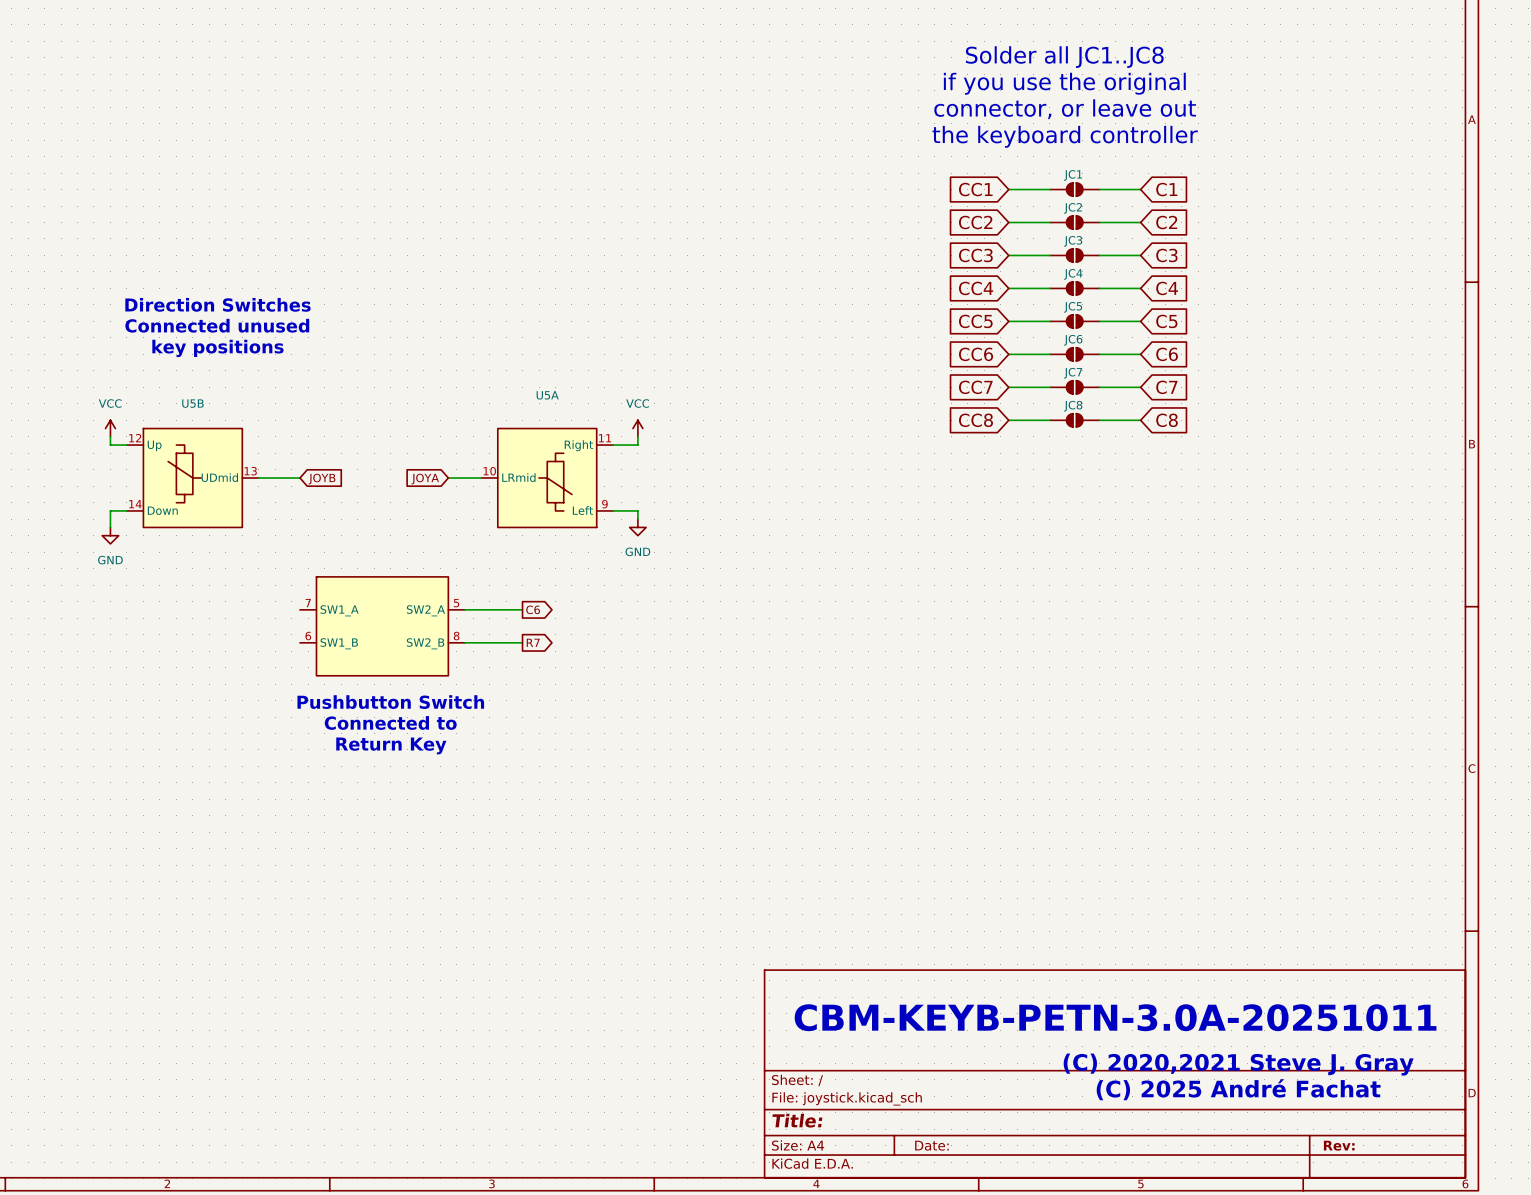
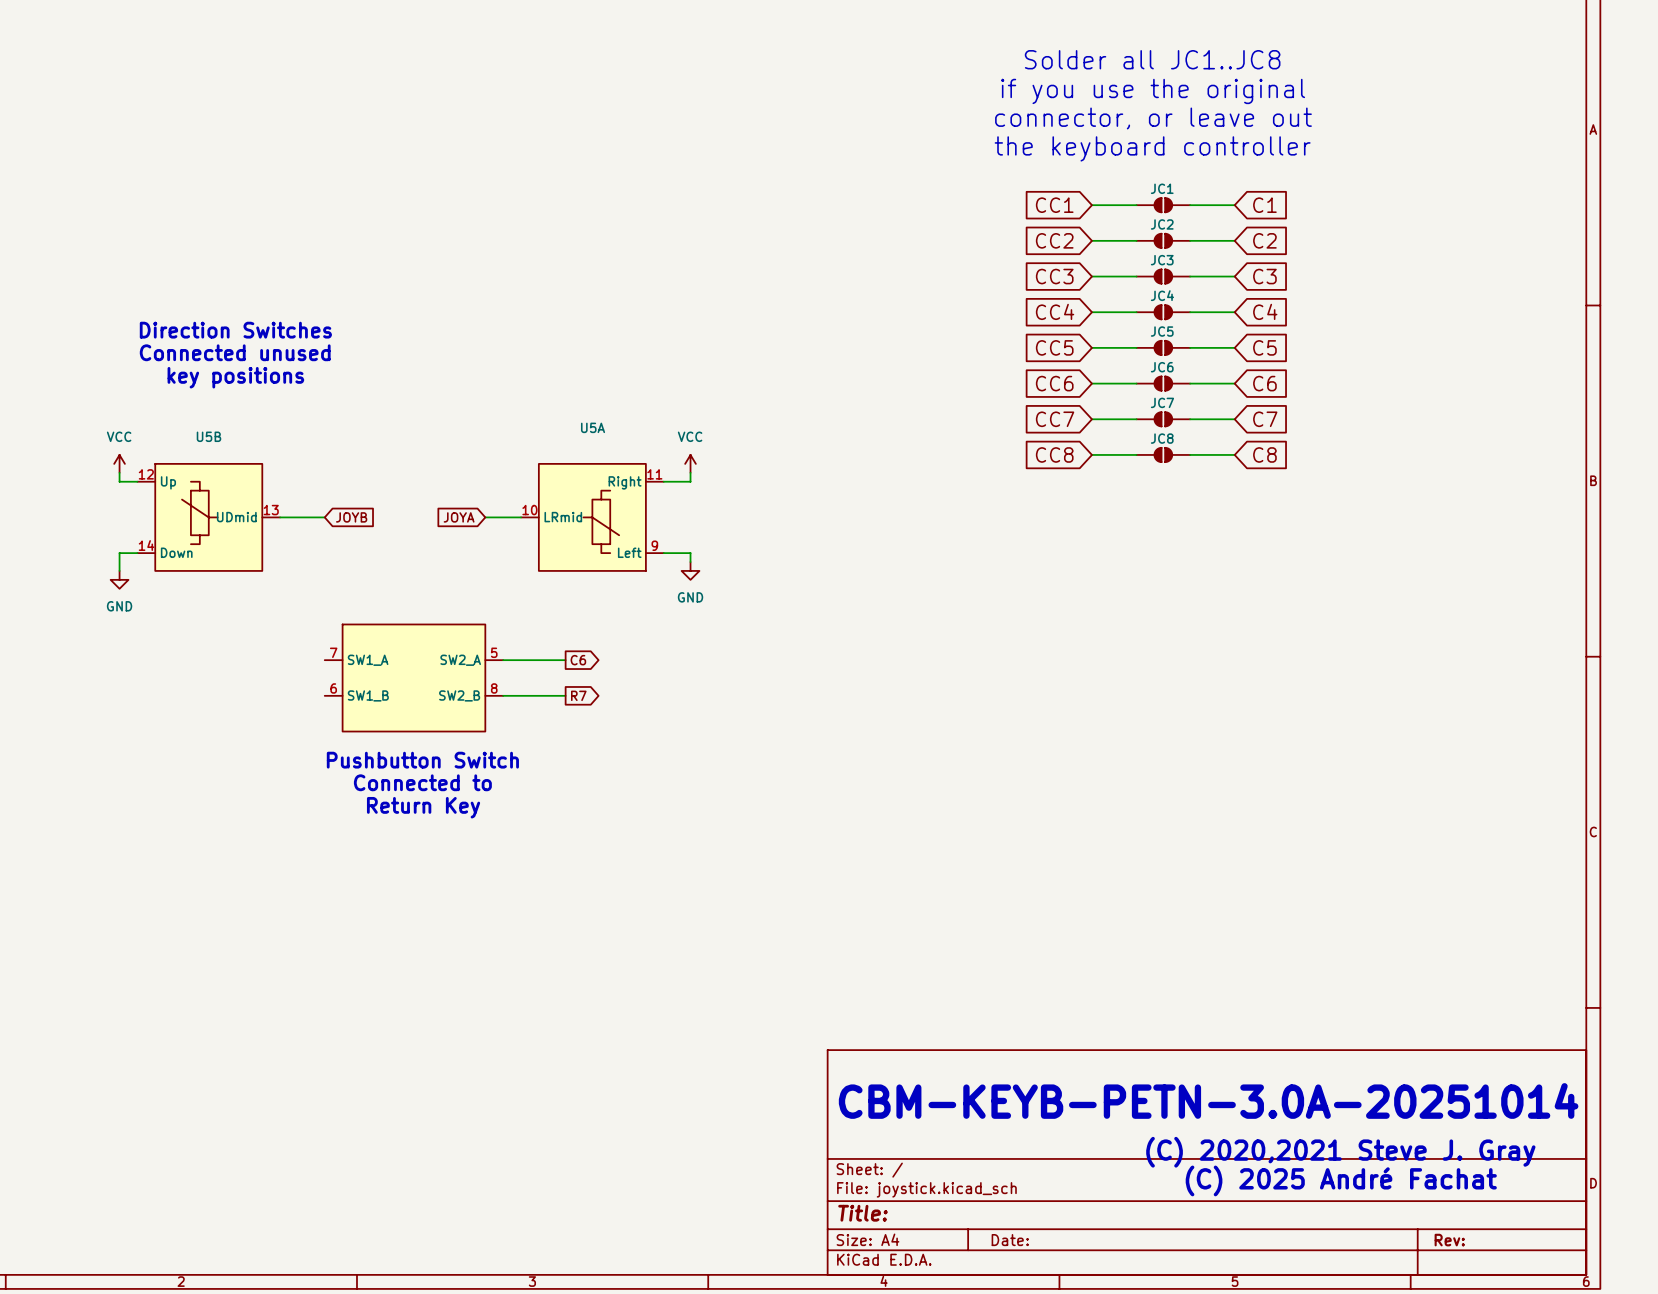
text: CBM-KEYB-PETN-3.0A-20251011 (1115, 1017) -> CBM-KEYB-PETN-3.0A-20251014 (1208, 1100)

